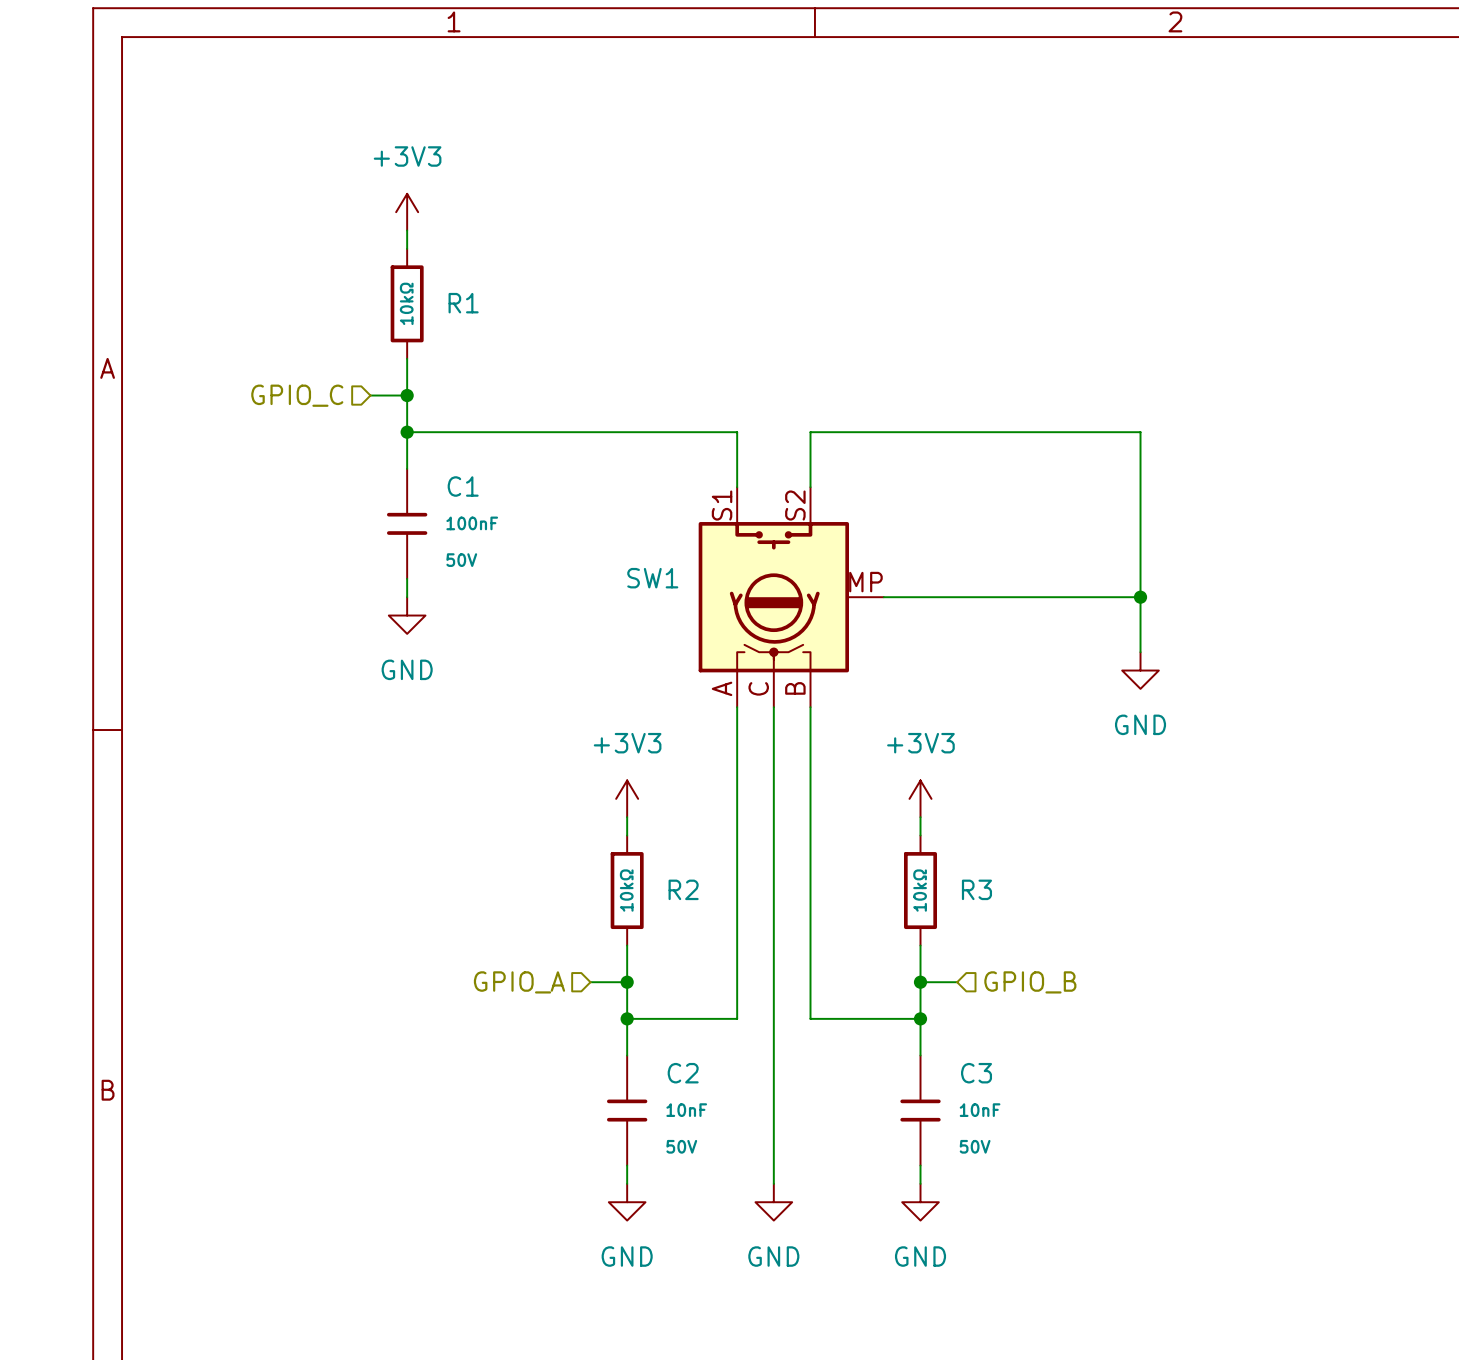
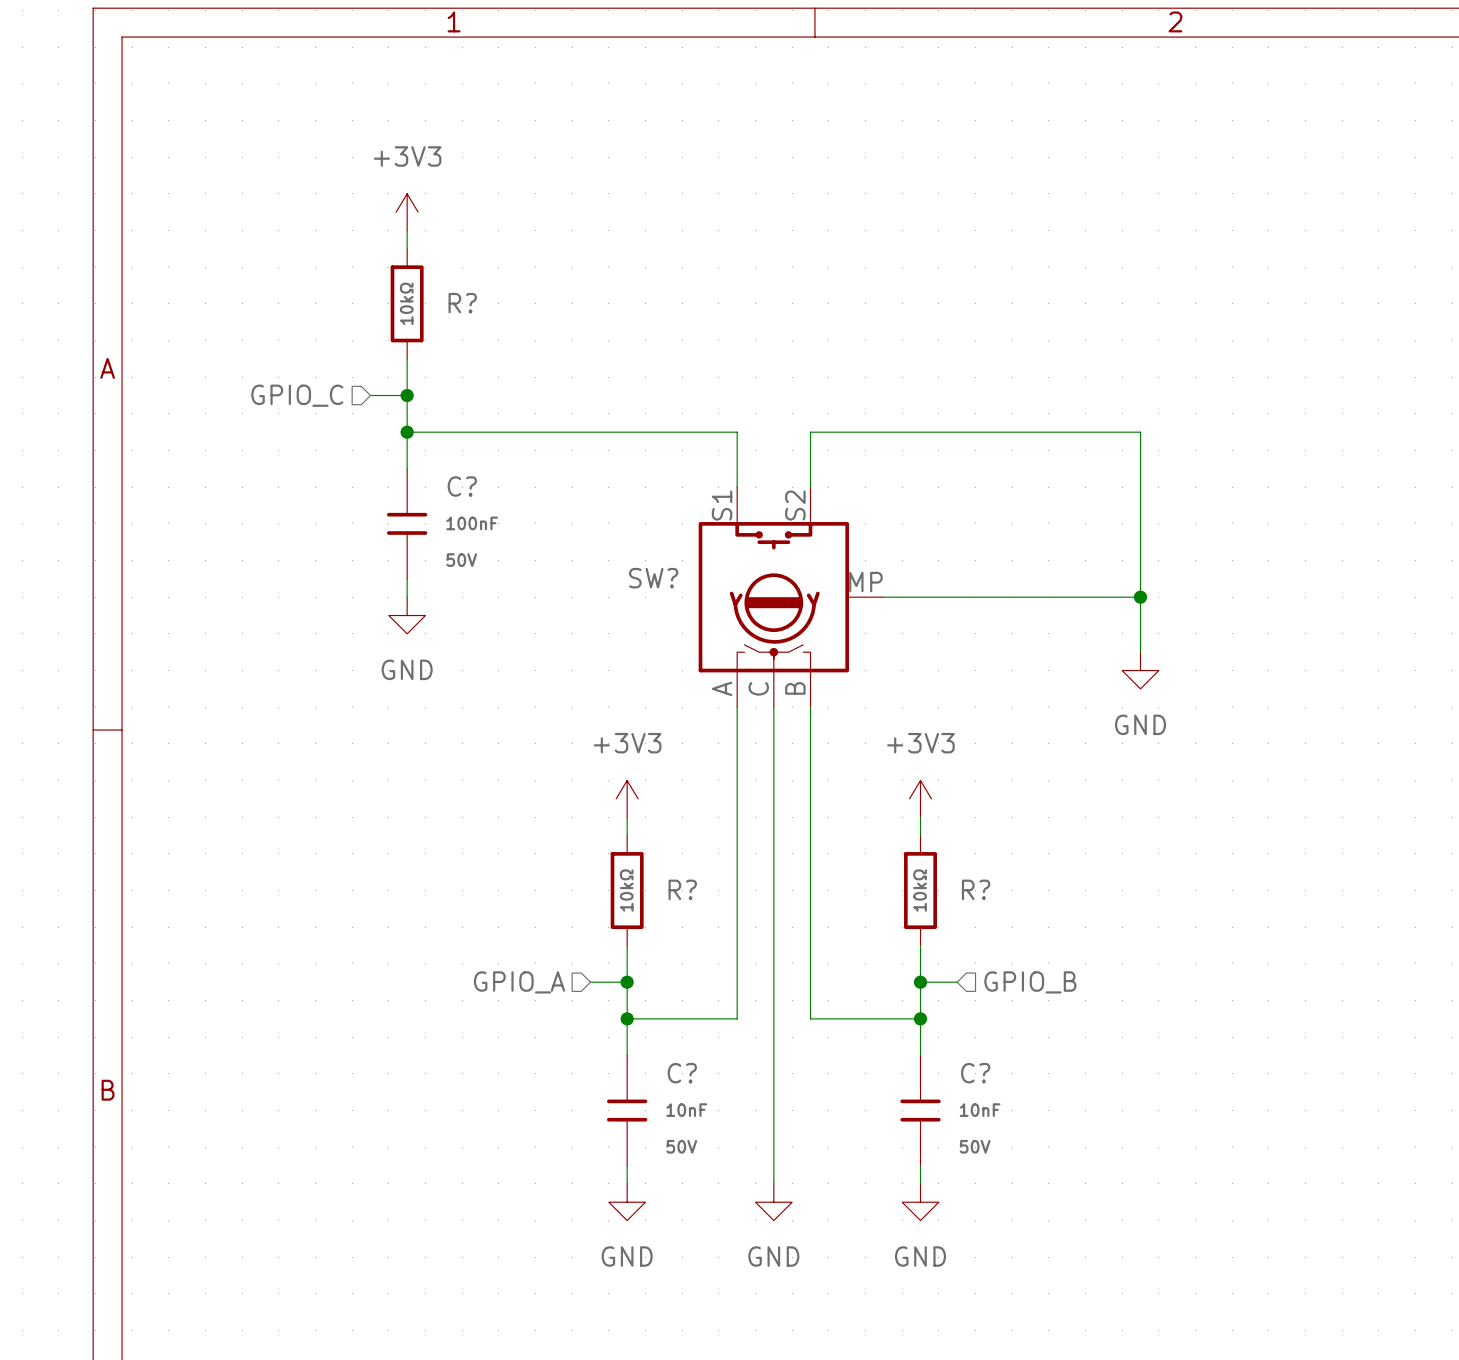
R1 name: R1 (463, 303) -> R? (462, 303)
C1 name: C1 (463, 486) -> C? (462, 486)
SW1 name: SW1 (652, 578) -> SW? (653, 578)
R2 name: R2 (683, 889) -> R? (682, 889)
R3 name: R3 (976, 889) -> R? (976, 889)
C2 name: C2 (683, 1073) -> C? (682, 1073)
C3 name: C3 (976, 1073) -> C? (975, 1073)

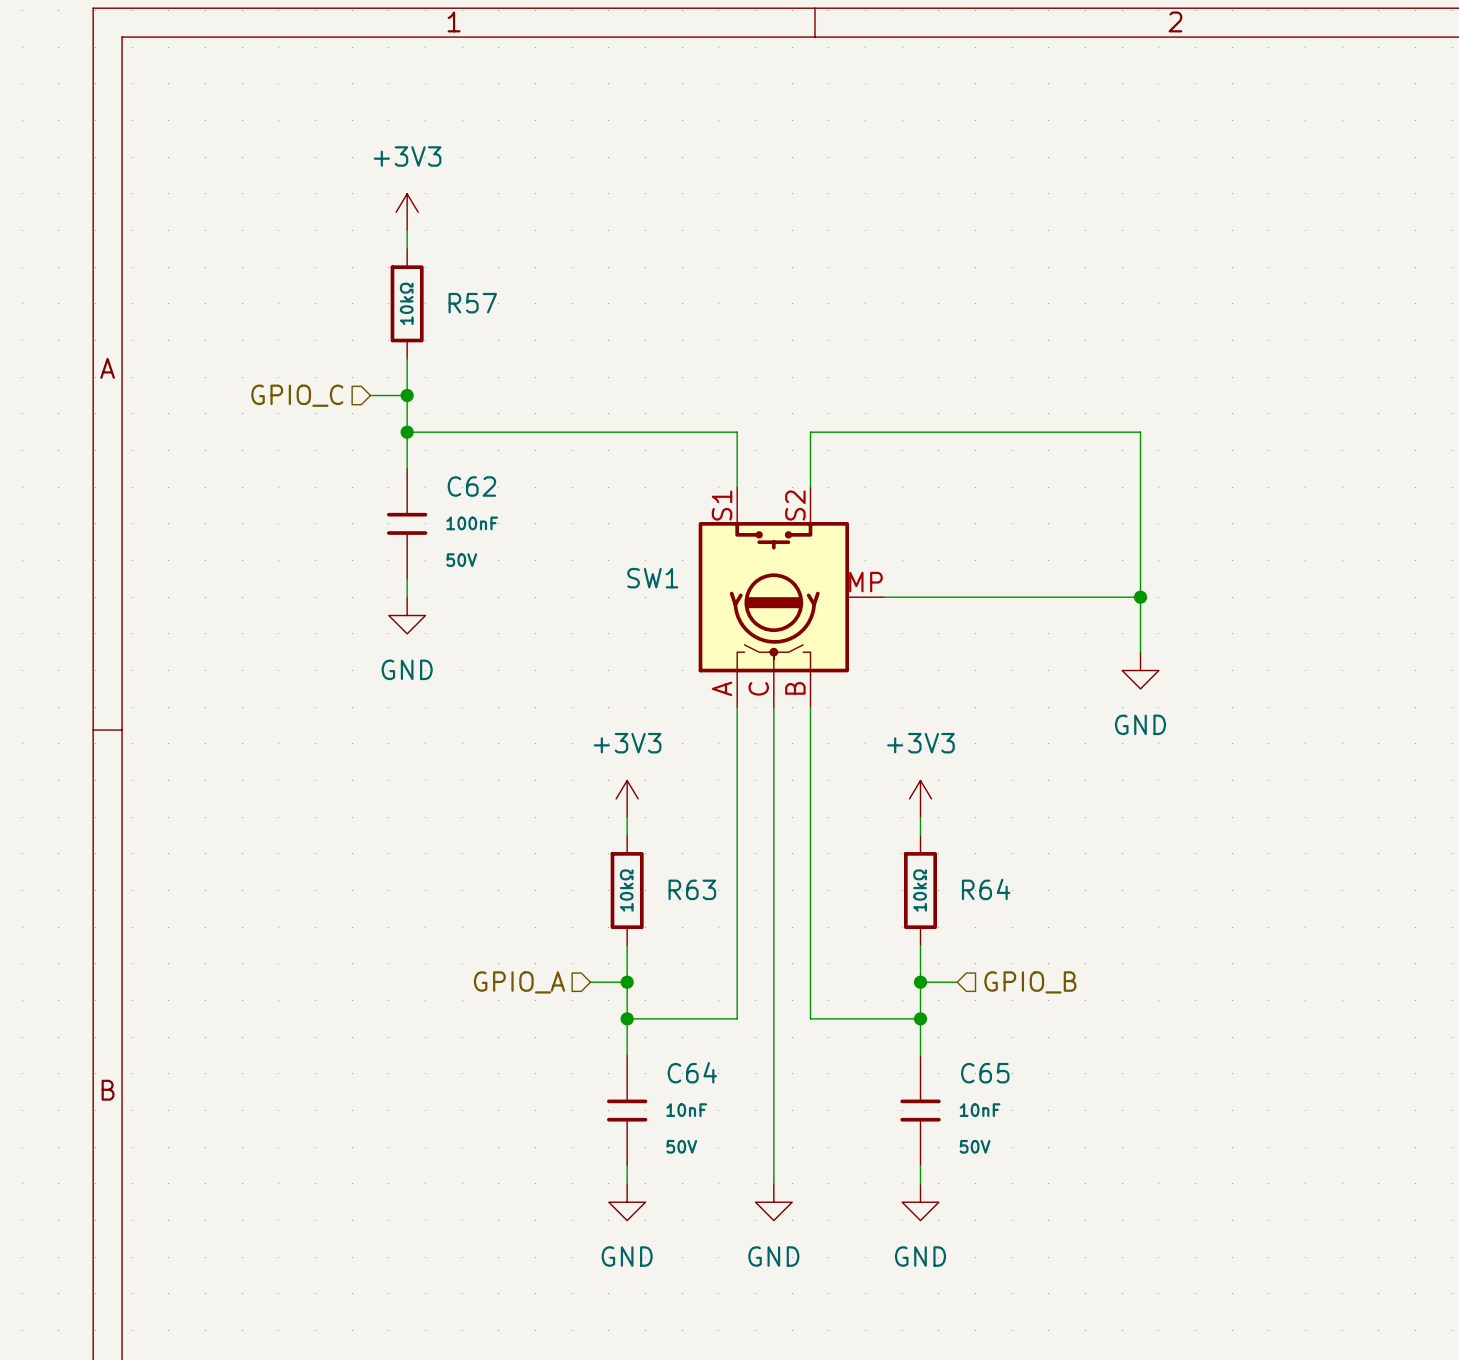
R? name: R? (462, 303) -> R57 (472, 303)
C? name: C? (462, 486) -> C62 (471, 486)
SW? name: SW? (653, 578) -> SW1 (652, 578)
R? name: R? (682, 889) -> R63 (692, 889)
R? name: R? (976, 889) -> R64 (986, 889)
C? name: C? (682, 1073) -> C64 (692, 1072)
C? name: C? (975, 1073) -> C65 (985, 1073)

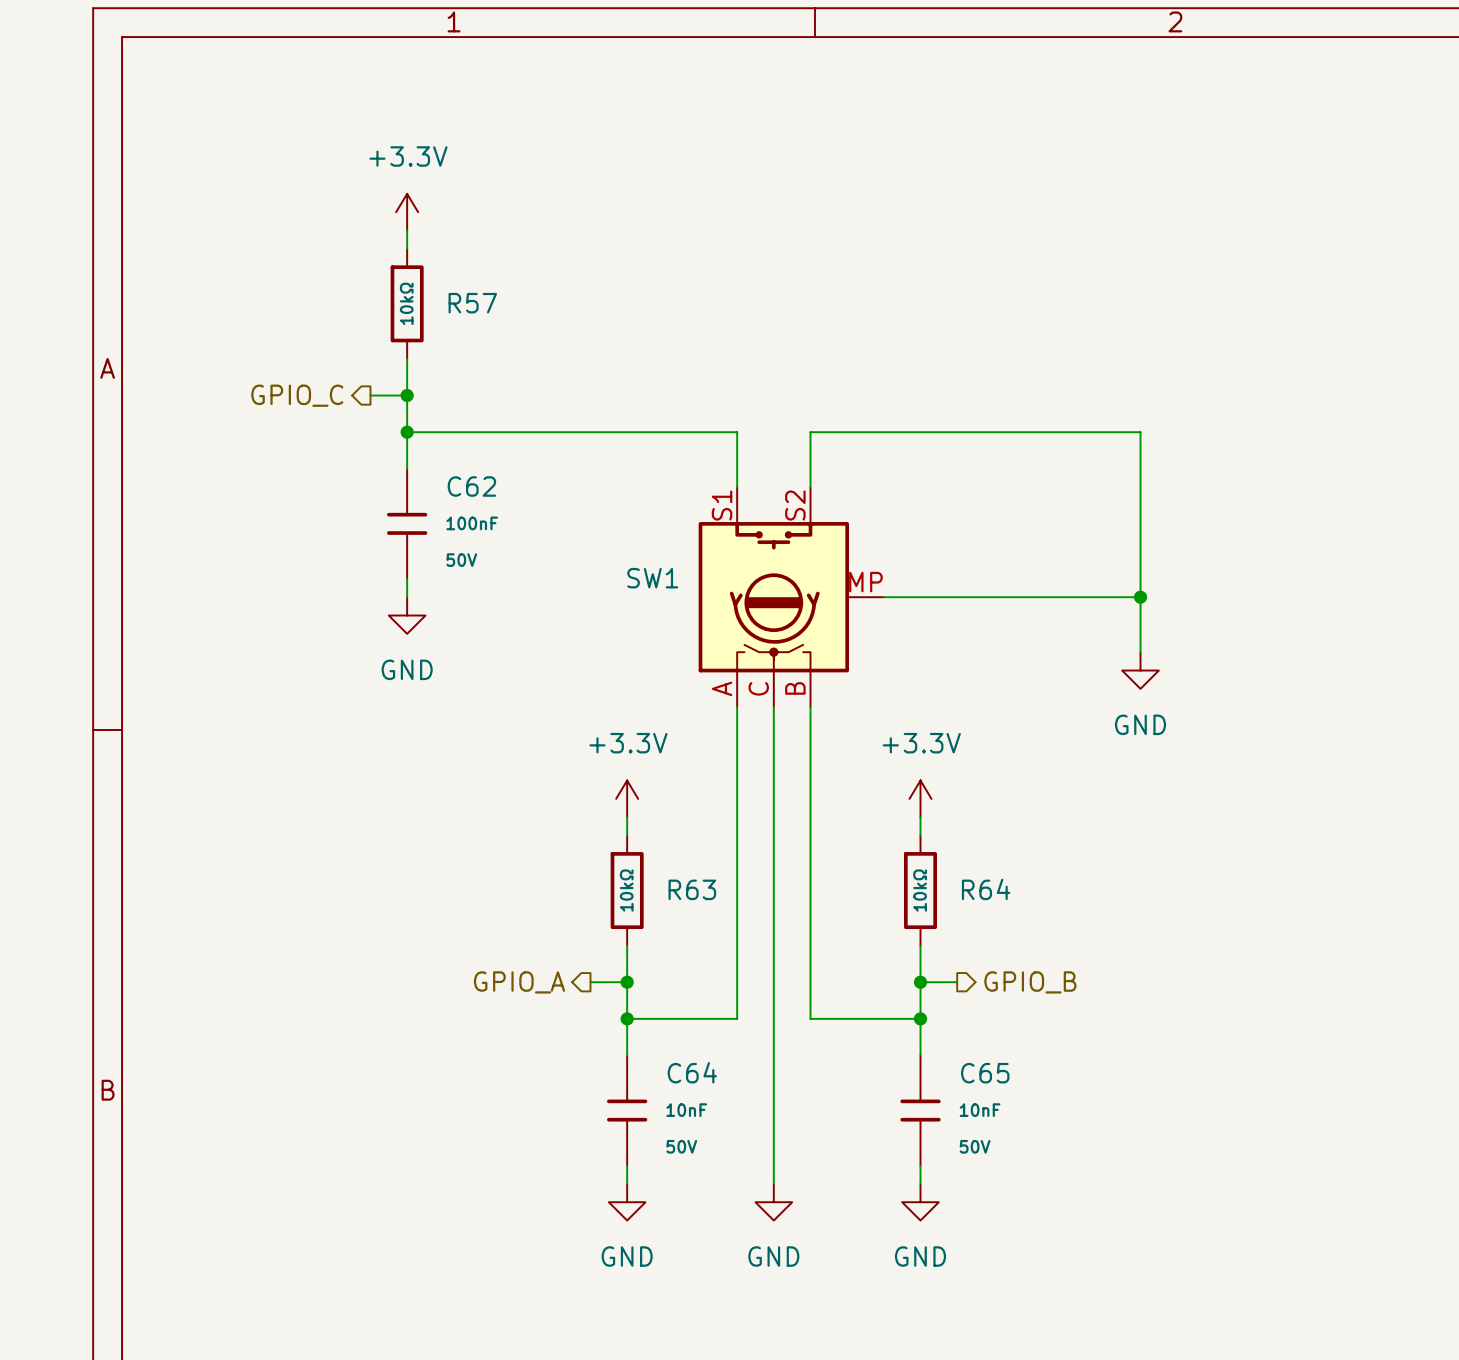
power symbol: +3V3 (407, 212) -> +3.3V (407, 212)
hierarchical label shape: input (297, 395) -> output (297, 395)
power symbol: +3V3 (627, 798) -> +3.3V (627, 798)
power symbol: +3V3 (920, 798) -> +3.3V (920, 798)
hierarchical label shape: input (519, 982) -> output (519, 982)
hierarchical label shape: input (1030, 982) -> output (1030, 982)

